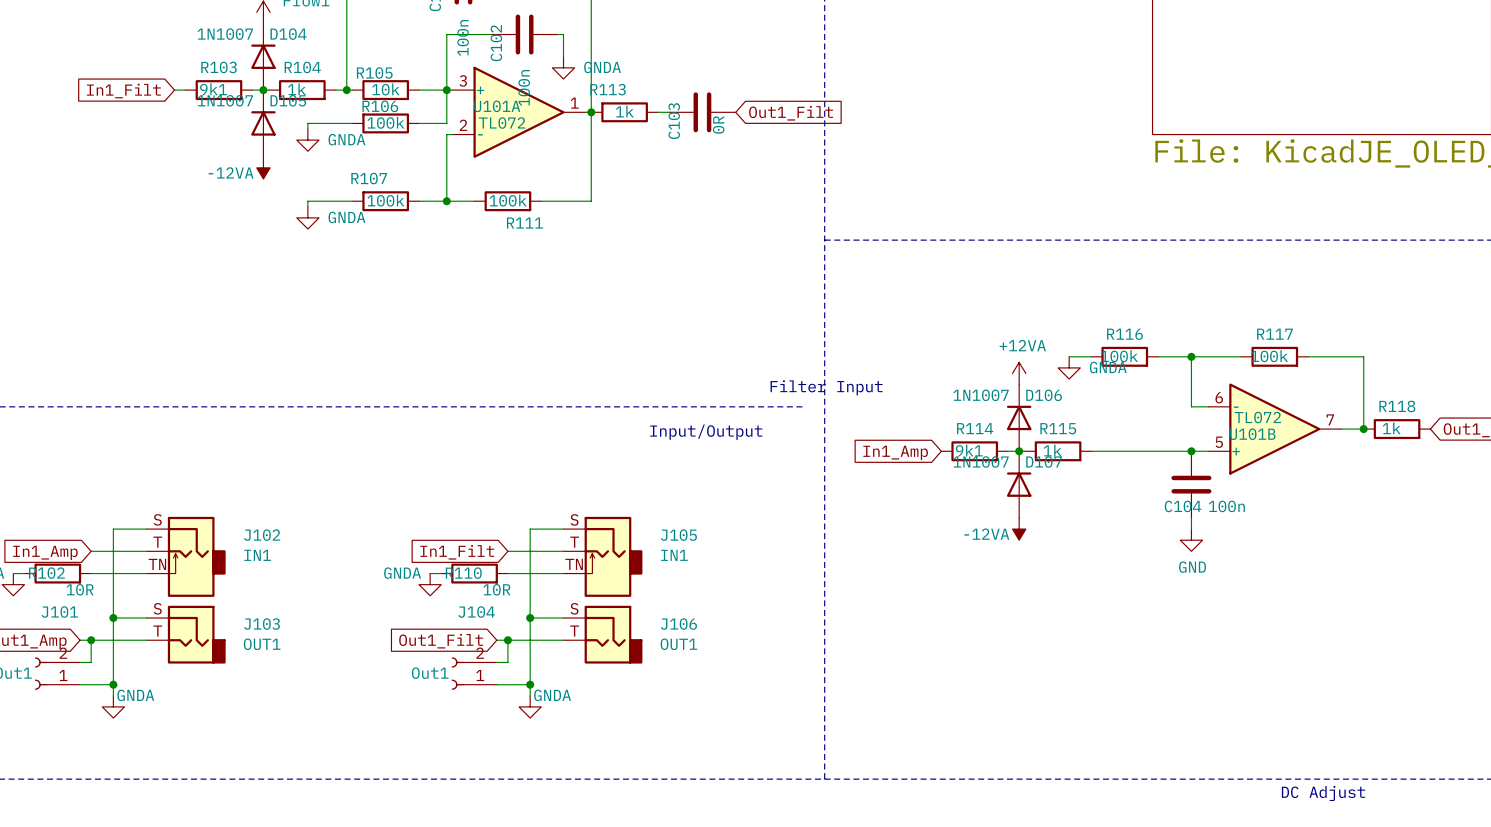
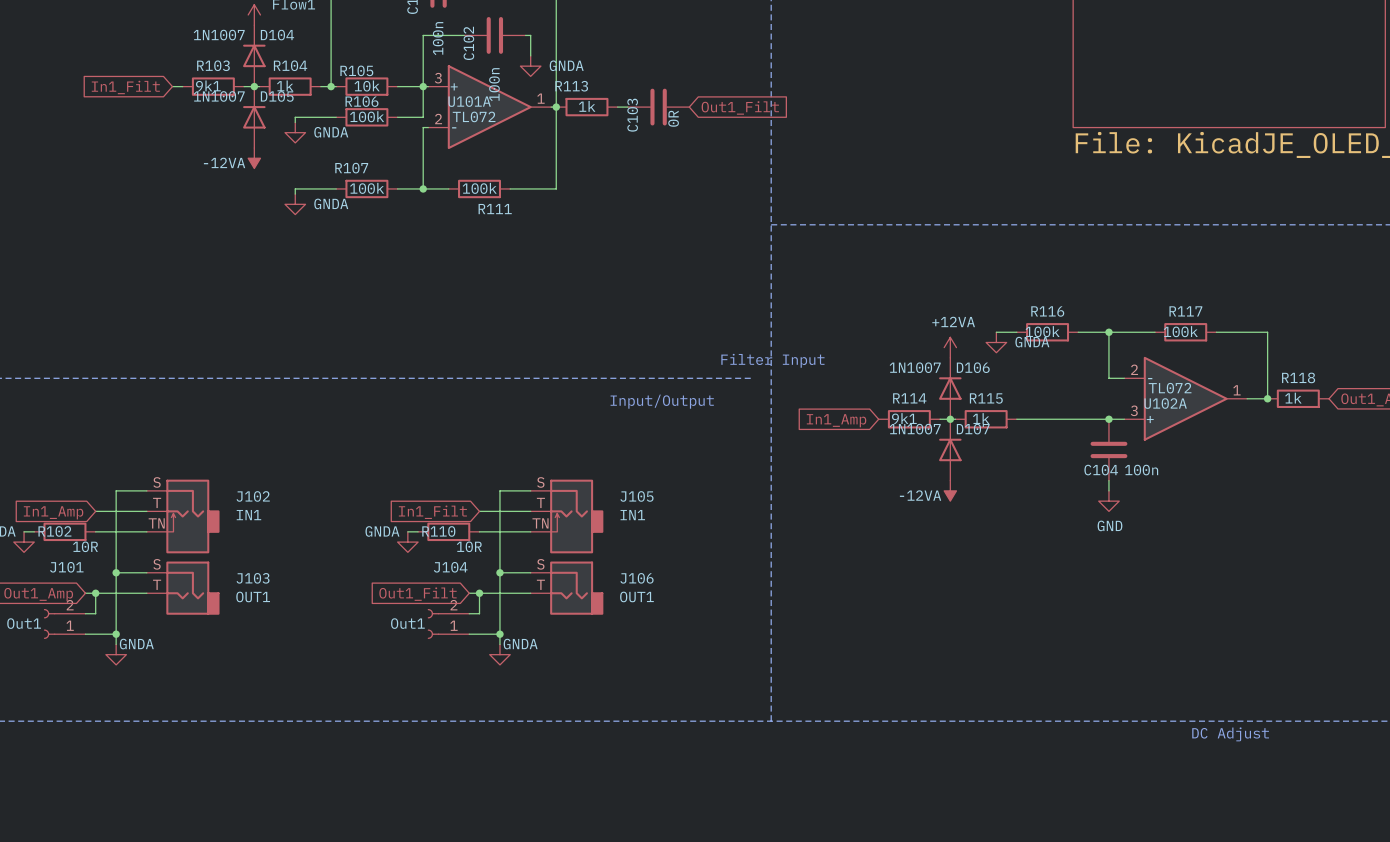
U101B pin number: 6 (1219, 397) -> 2 (1134, 369)
U101B pin number: 7 (1330, 419) -> 1 (1236, 390)
U101B name: U101B (1252, 434) -> U102A (1165, 403)
U101B pin number: 5 (1219, 442) -> 3 (1134, 410)

